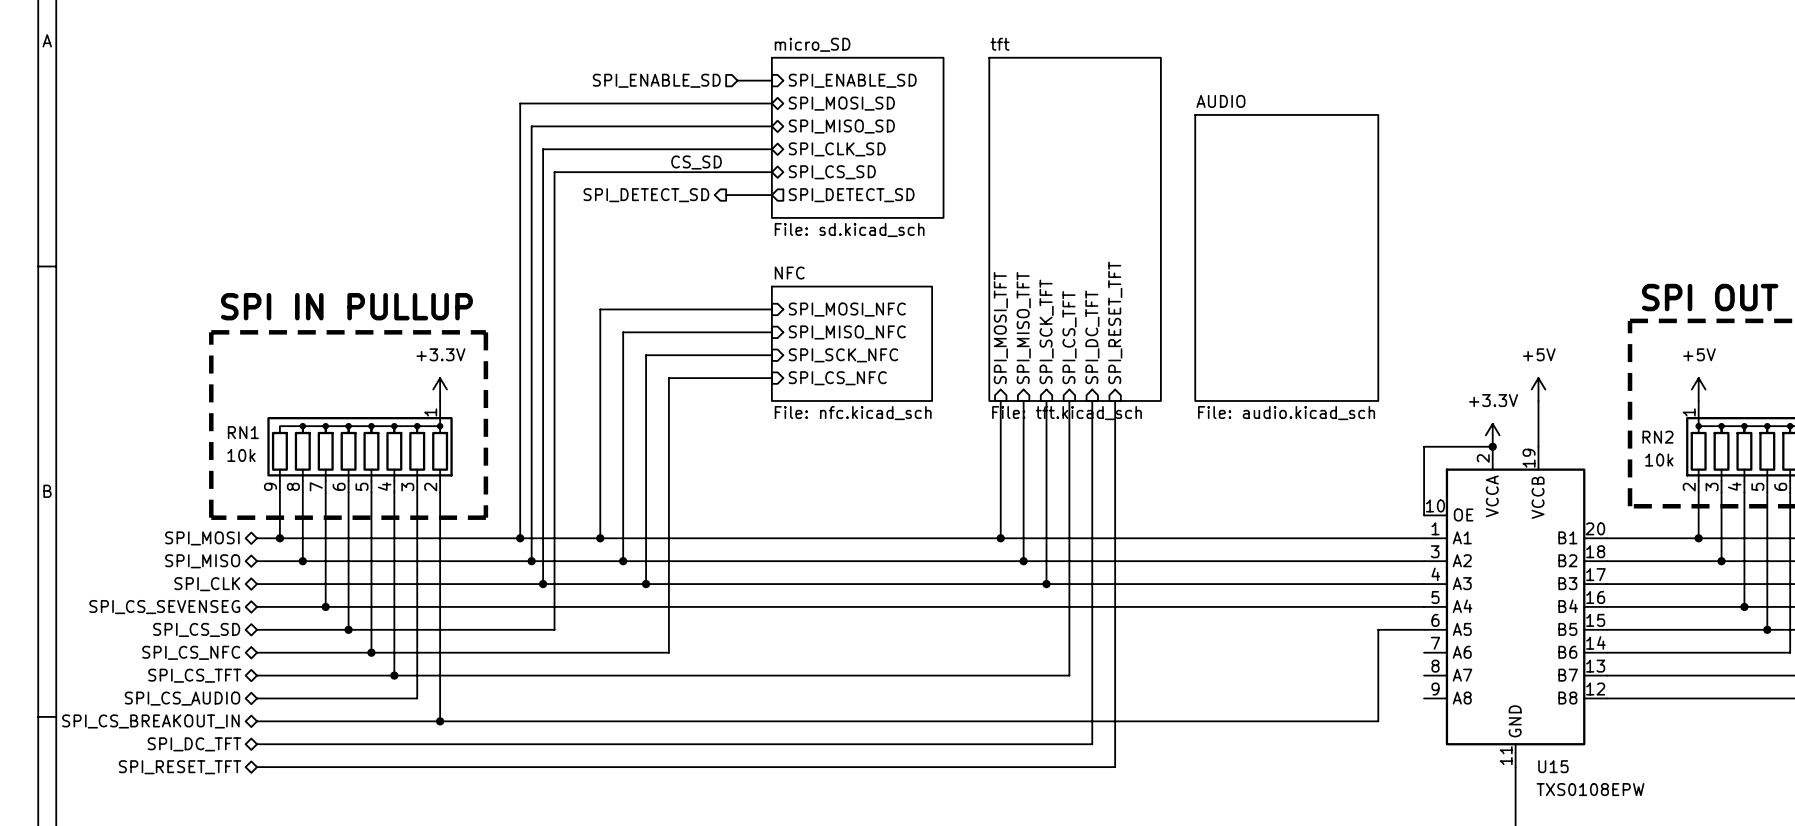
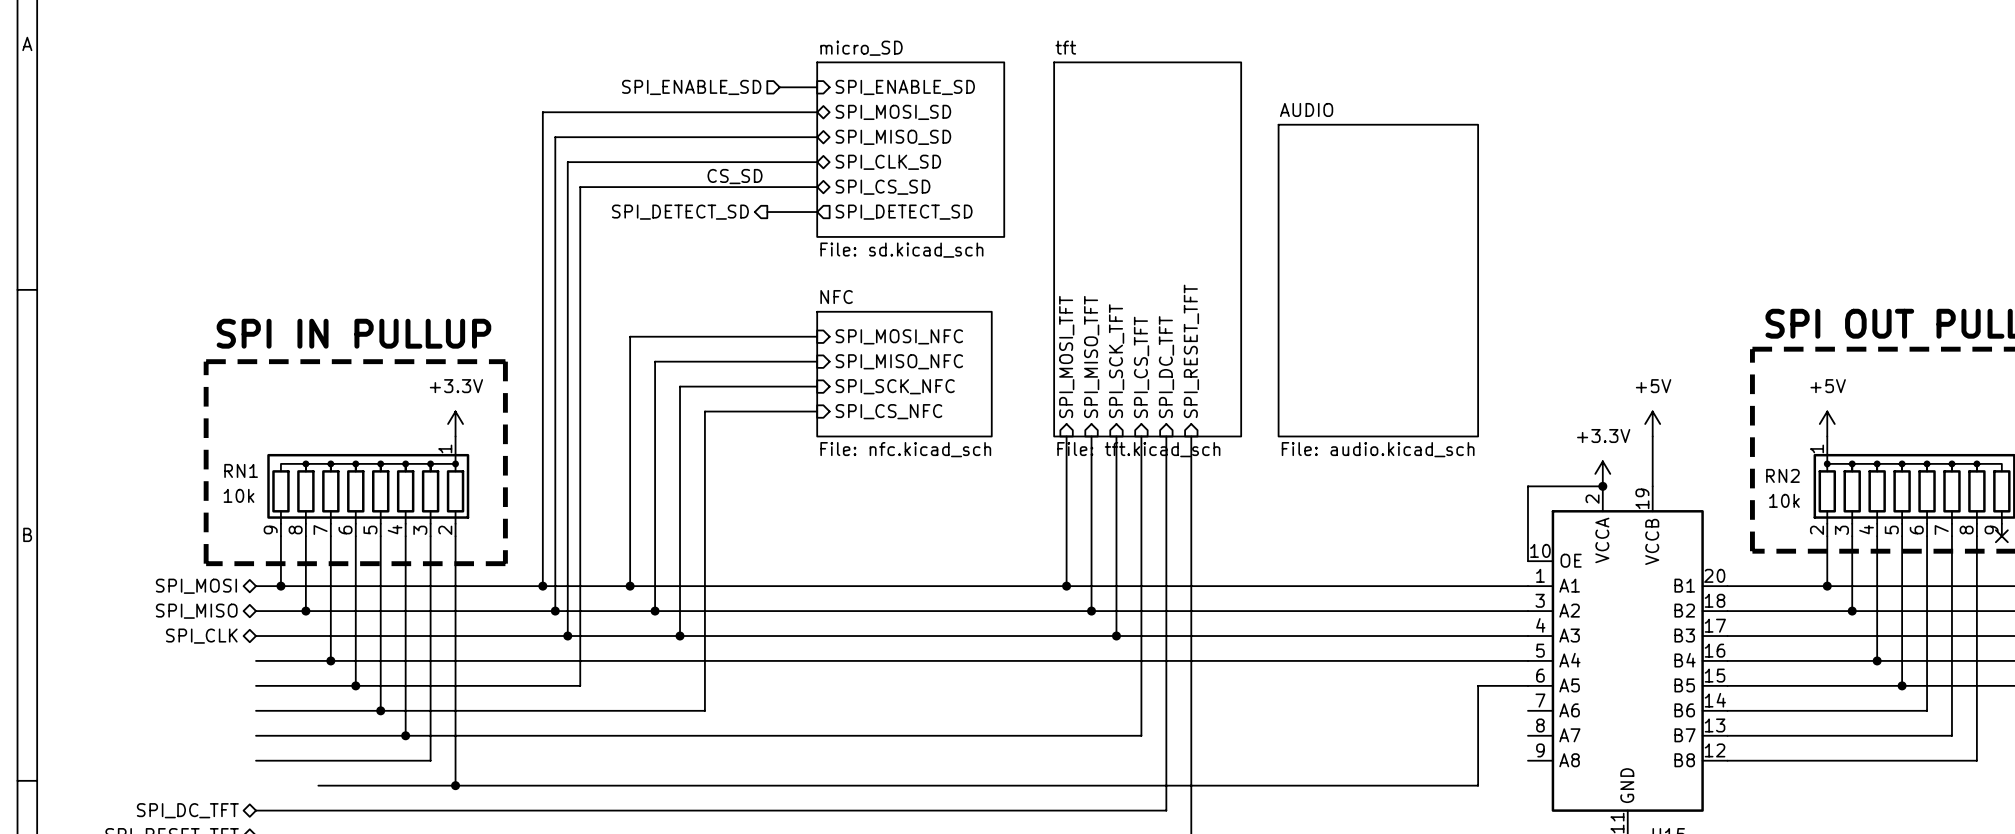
hierarchical label: SPI_CS_SEVENSEG (164, 607) -> none
hierarchical label: SPI_CS_SD (196, 629) -> none
hierarchical label: SPI_CS_NFC (191, 652) -> none
hierarchical label: SPI_CS_TFT (194, 675) -> none
hierarchical label: SPI_CS_AUDIO (182, 698) -> none
hierarchical label: SPI_CS_BREAKOUT_IN (150, 721) -> none
wire: (257, 721) (314, 721) -> none

